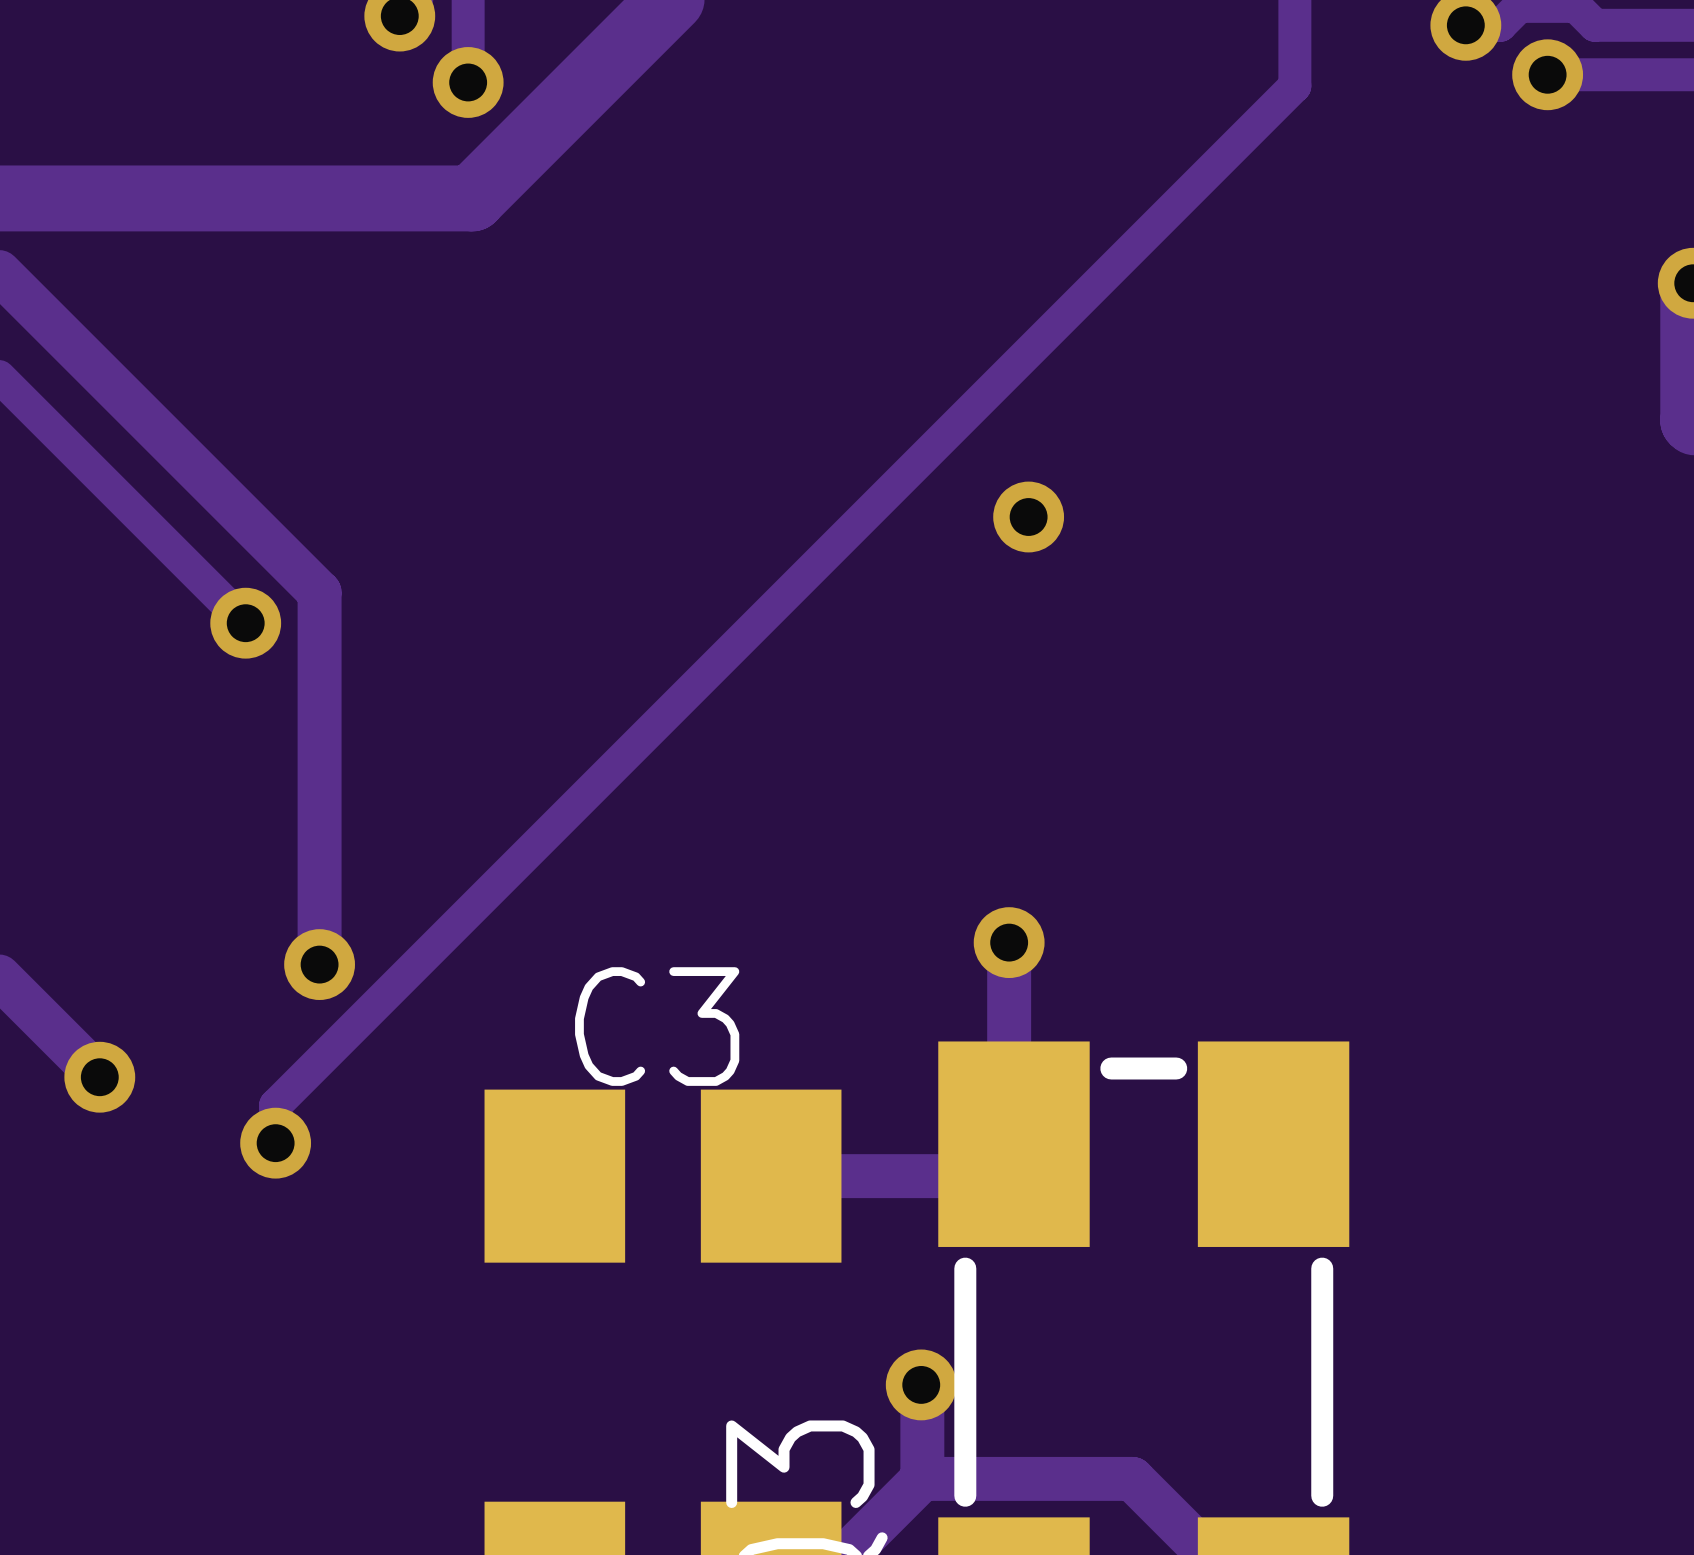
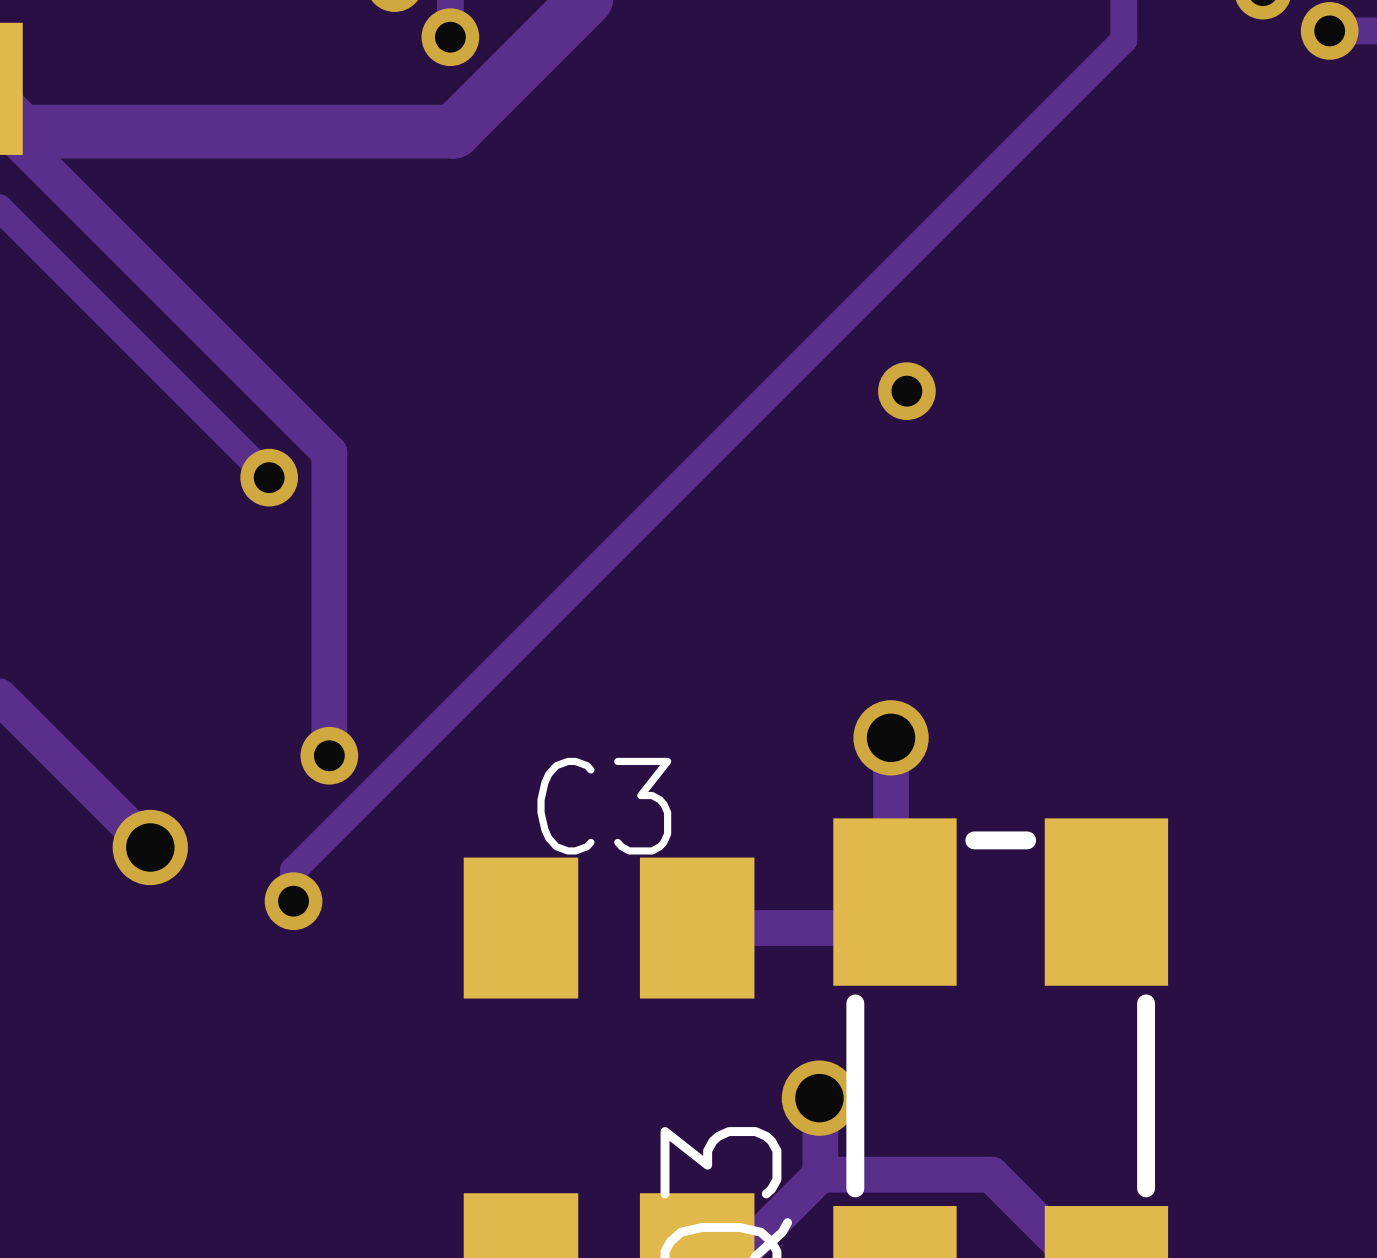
via size: [973, 907, 1045, 979] -> [853, 700, 929, 776]
via size: [64, 1041, 136, 1113] -> [112, 809, 188, 886]
via size: [885, 1349, 957, 1421] -> [781, 1060, 858, 1136]

